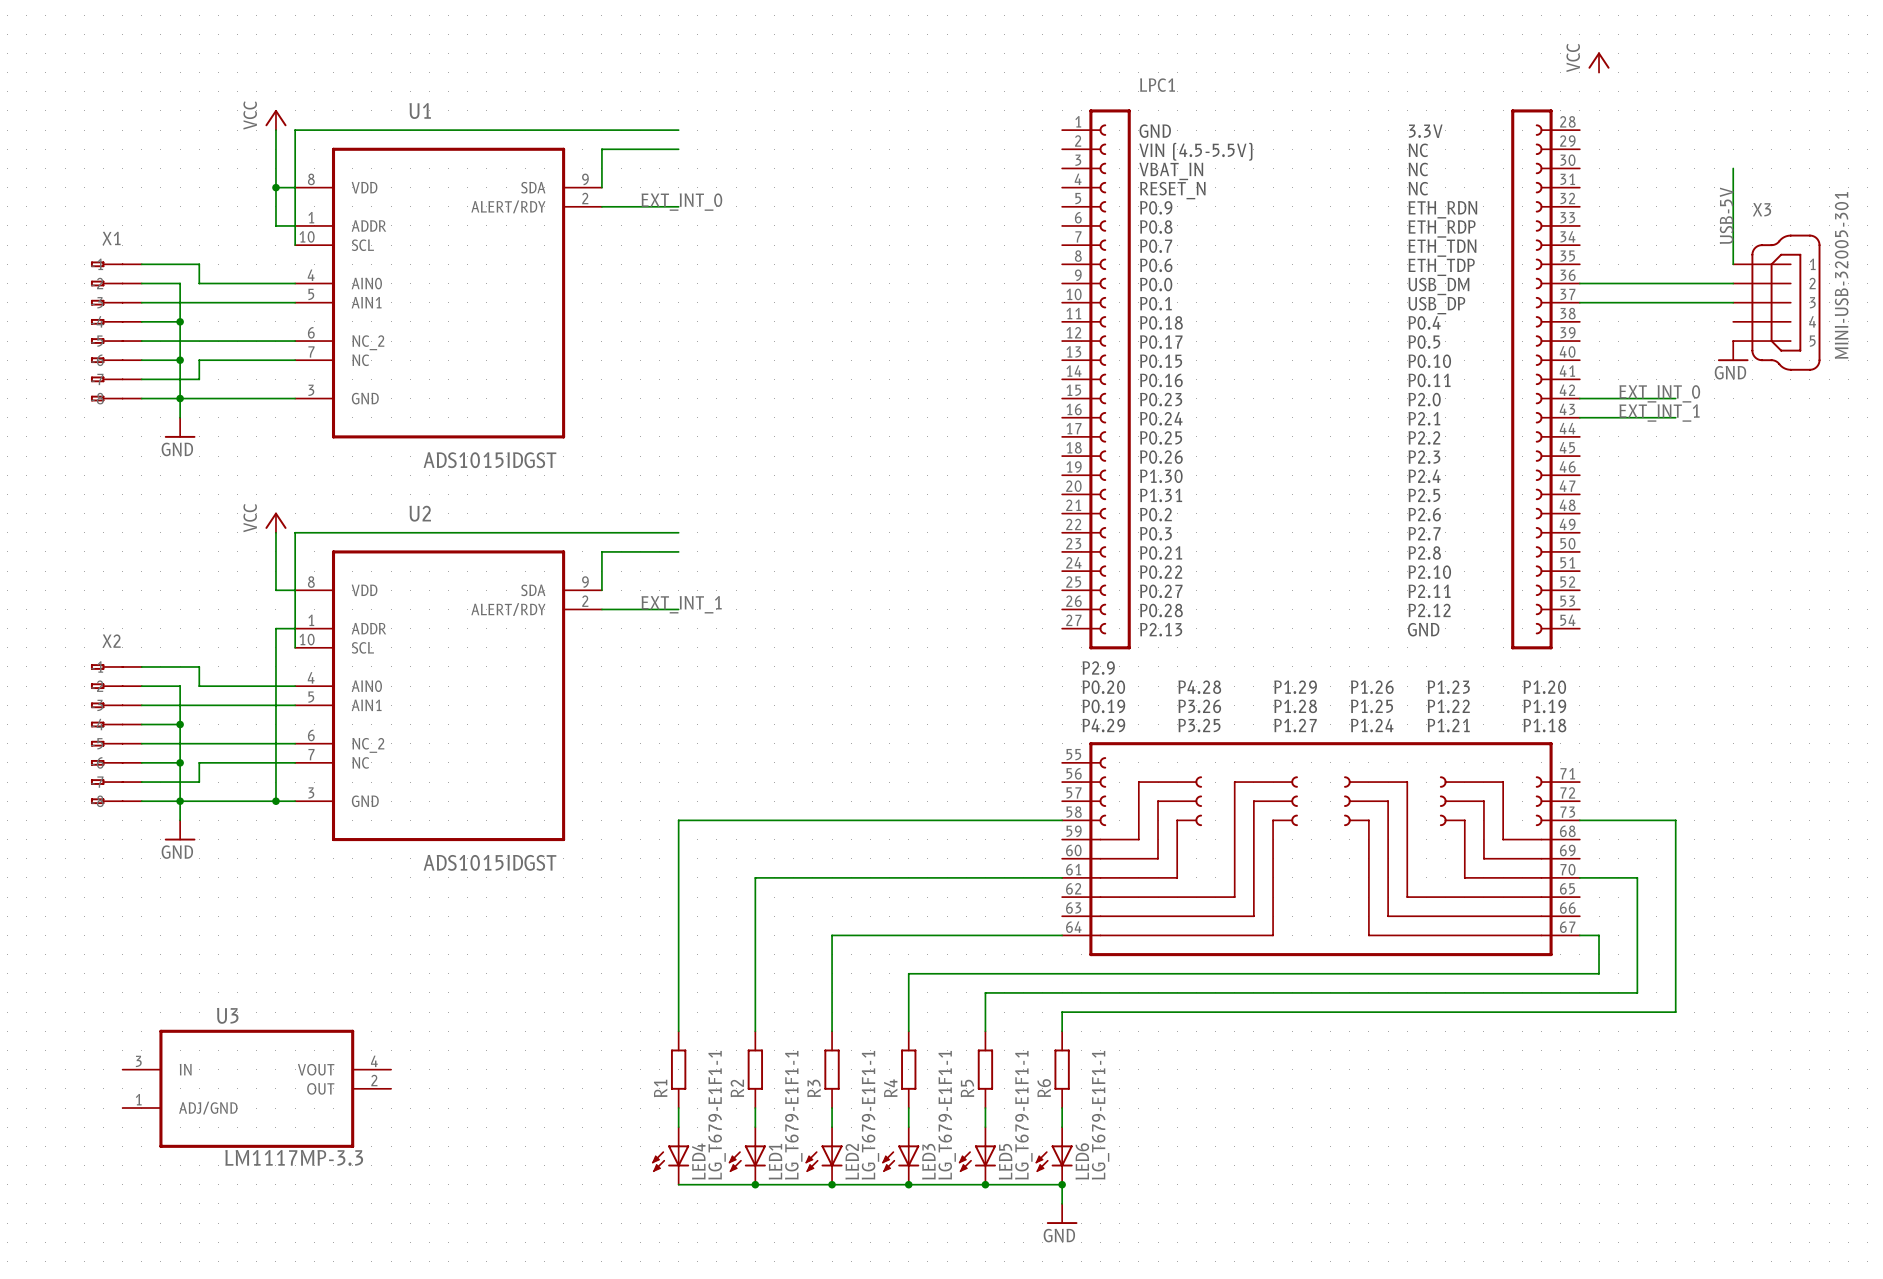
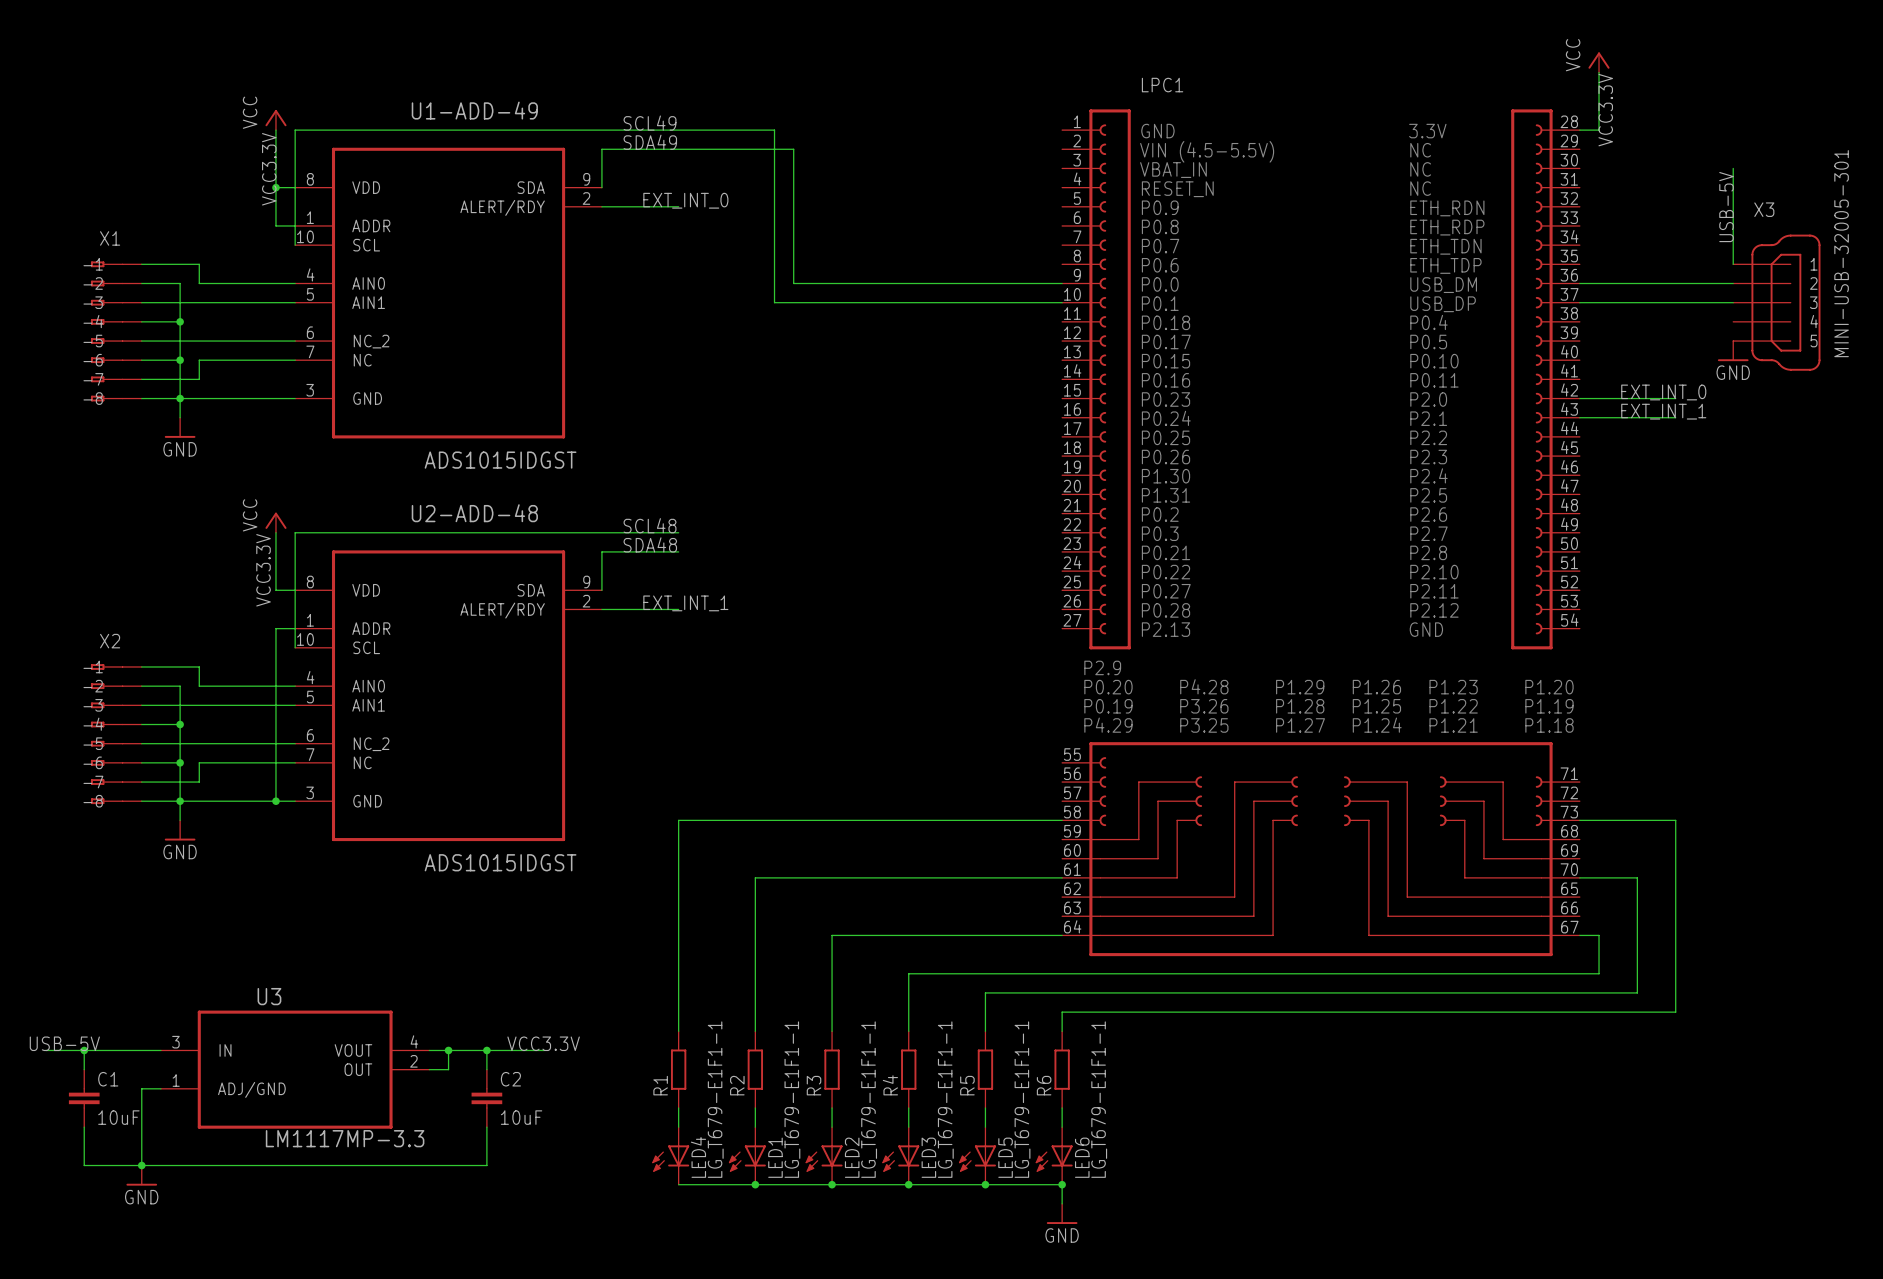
wire: none -> (1599, 72) (1599, 130) (1579, 130)
label: none -> VCC3.3V (1605, 110)
U1 name: U1 (420, 111) -> U1-ADD-49 (474, 110)
label: none -> SCL49 (650, 123)
wire: none -> (678, 130) (774, 130) (774, 302) (1062, 302)
label: none -> SDA49 (650, 142)
wire: none -> (678, 149) (793, 149) (793, 283) (1062, 283)
label: none -> VCC3.3V (269, 169)
U2 name: U2 (420, 513) -> U2-ADD-48 (474, 513)
label: none -> SCL48 (650, 525)
label: none -> SDA48 (650, 544)
label: none -> VCC3.3V (263, 570)
label: none -> USB-5V (64, 1043)
label: none -> VCC3.3V (543, 1043)
wire: none -> (45, 1050) (160, 1050)
wire: none -> (84, 1050) (84, 1069)
junction: none -> (84, 1050)
wire: none -> (429, 1050) (544, 1050)
wire: none -> (448, 1050) (448, 1069) (429, 1069)
junction: none -> (448, 1050)
wire: none -> (486, 1050) (486, 1069)
junction: none -> (486, 1050)
wire: none -> (160, 1088) (141, 1088) (141, 1165)
U3 position: (256, 1088) -> (295, 1069)
C1: none -> 10uF (84, 1098)
C2: none -> 10uF (486, 1098)
wire: none -> (84, 1127) (84, 1165) (486, 1165) (486, 1127)
junction: none -> (141, 1165)
power symbol: none -> GND (141, 1175)

